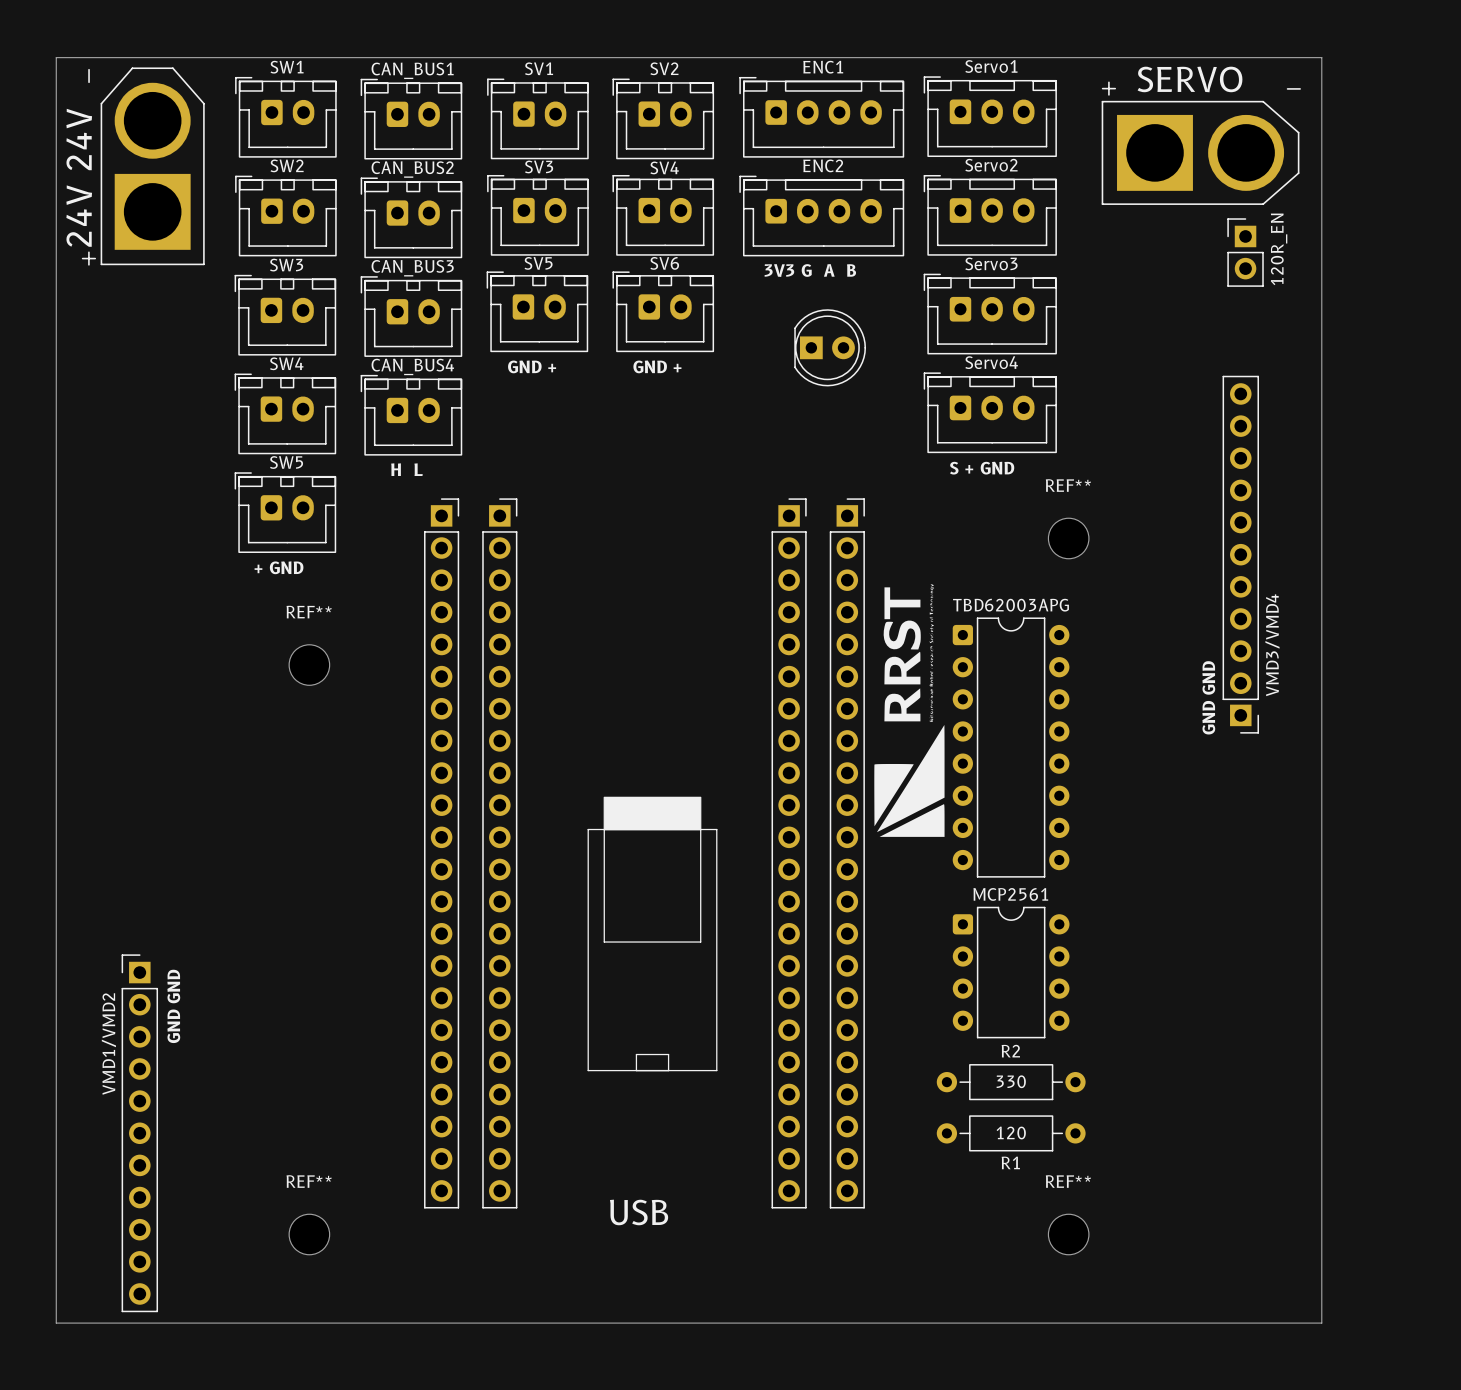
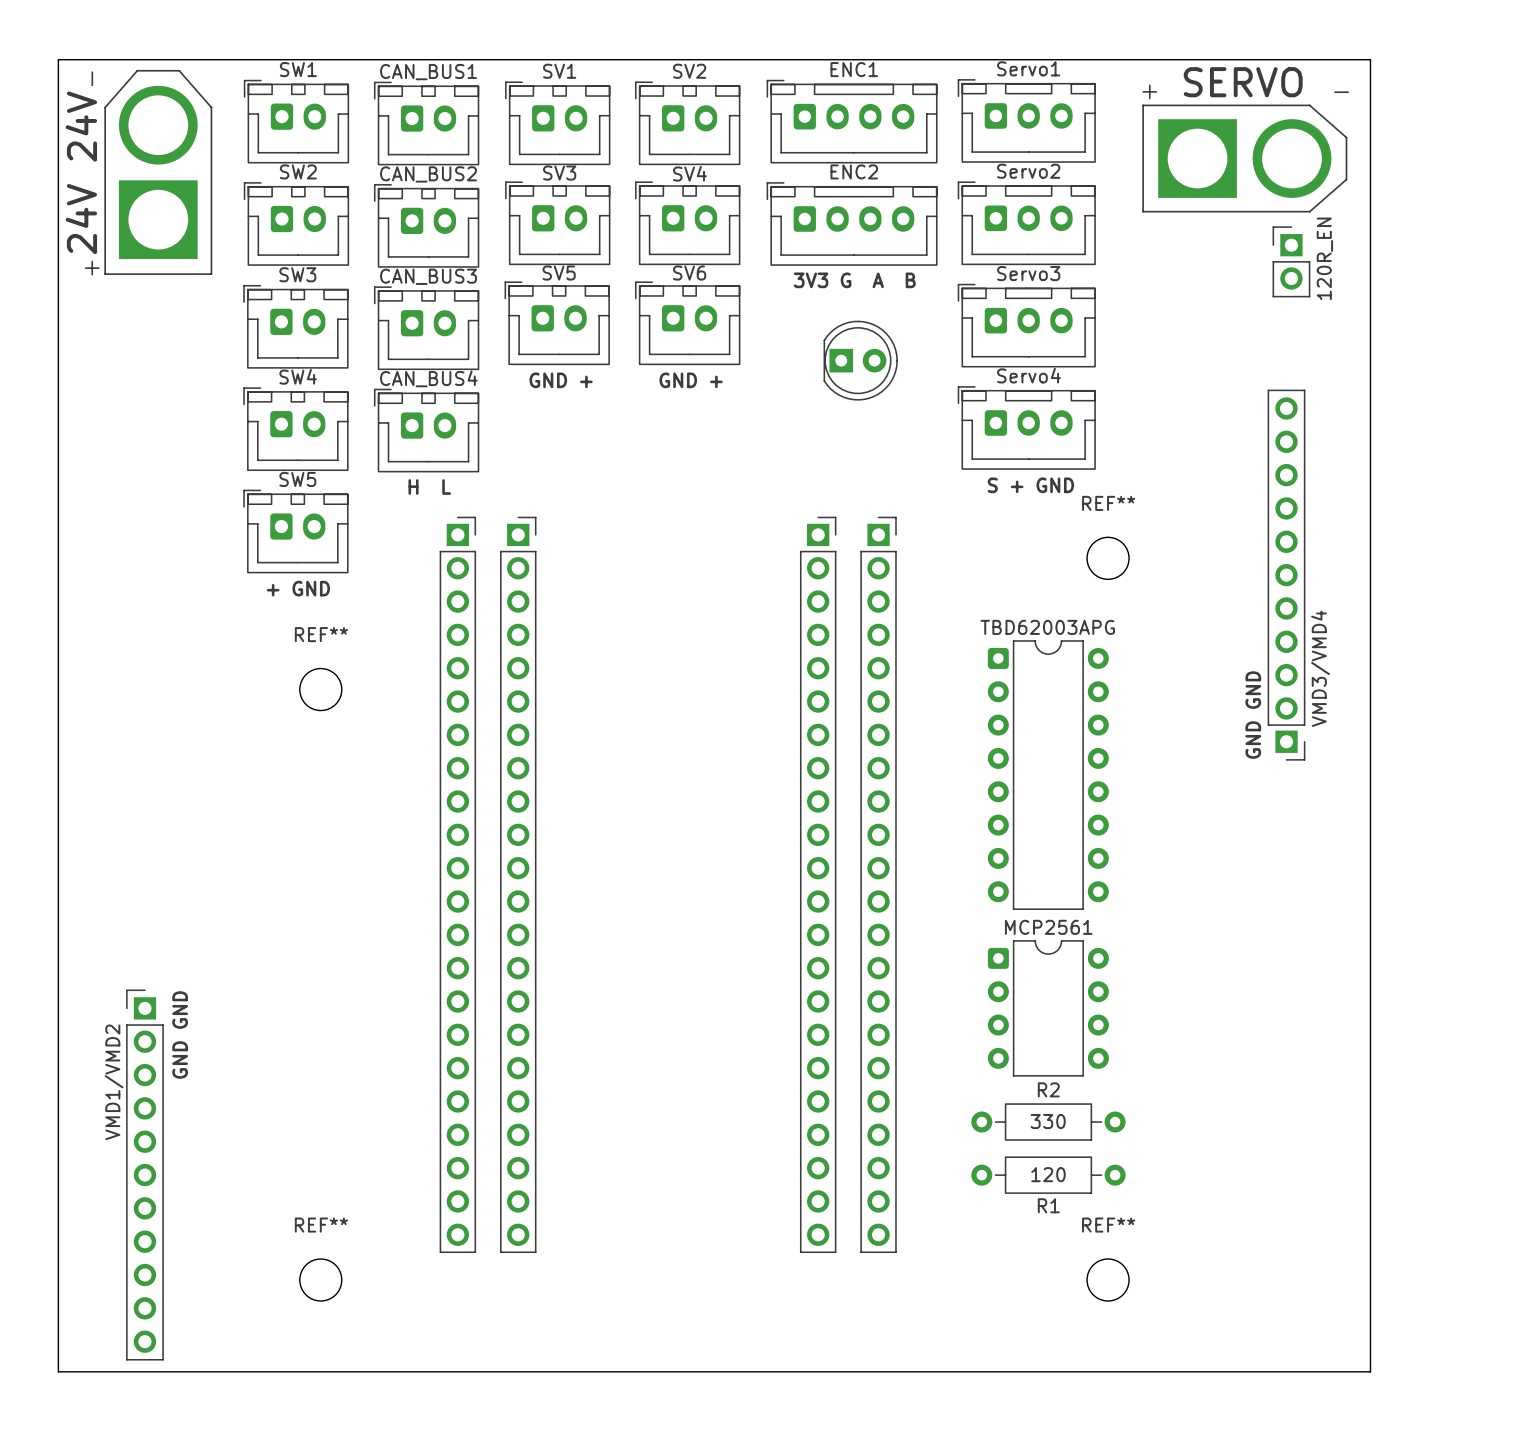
drawing: [874, 584, 945, 837] -> none
drawing: [603, 796, 702, 831] -> none
line: (588, 829) (716, 829) (716, 1070) (588, 1070) (588, 829) -> none
line: (604, 829) (604, 942) (700, 942) (700, 829) -> none
line: (636, 1070) (636, 1054) (668, 1054) (668, 1070) -> none
text: USB (639, 1212) -> none

